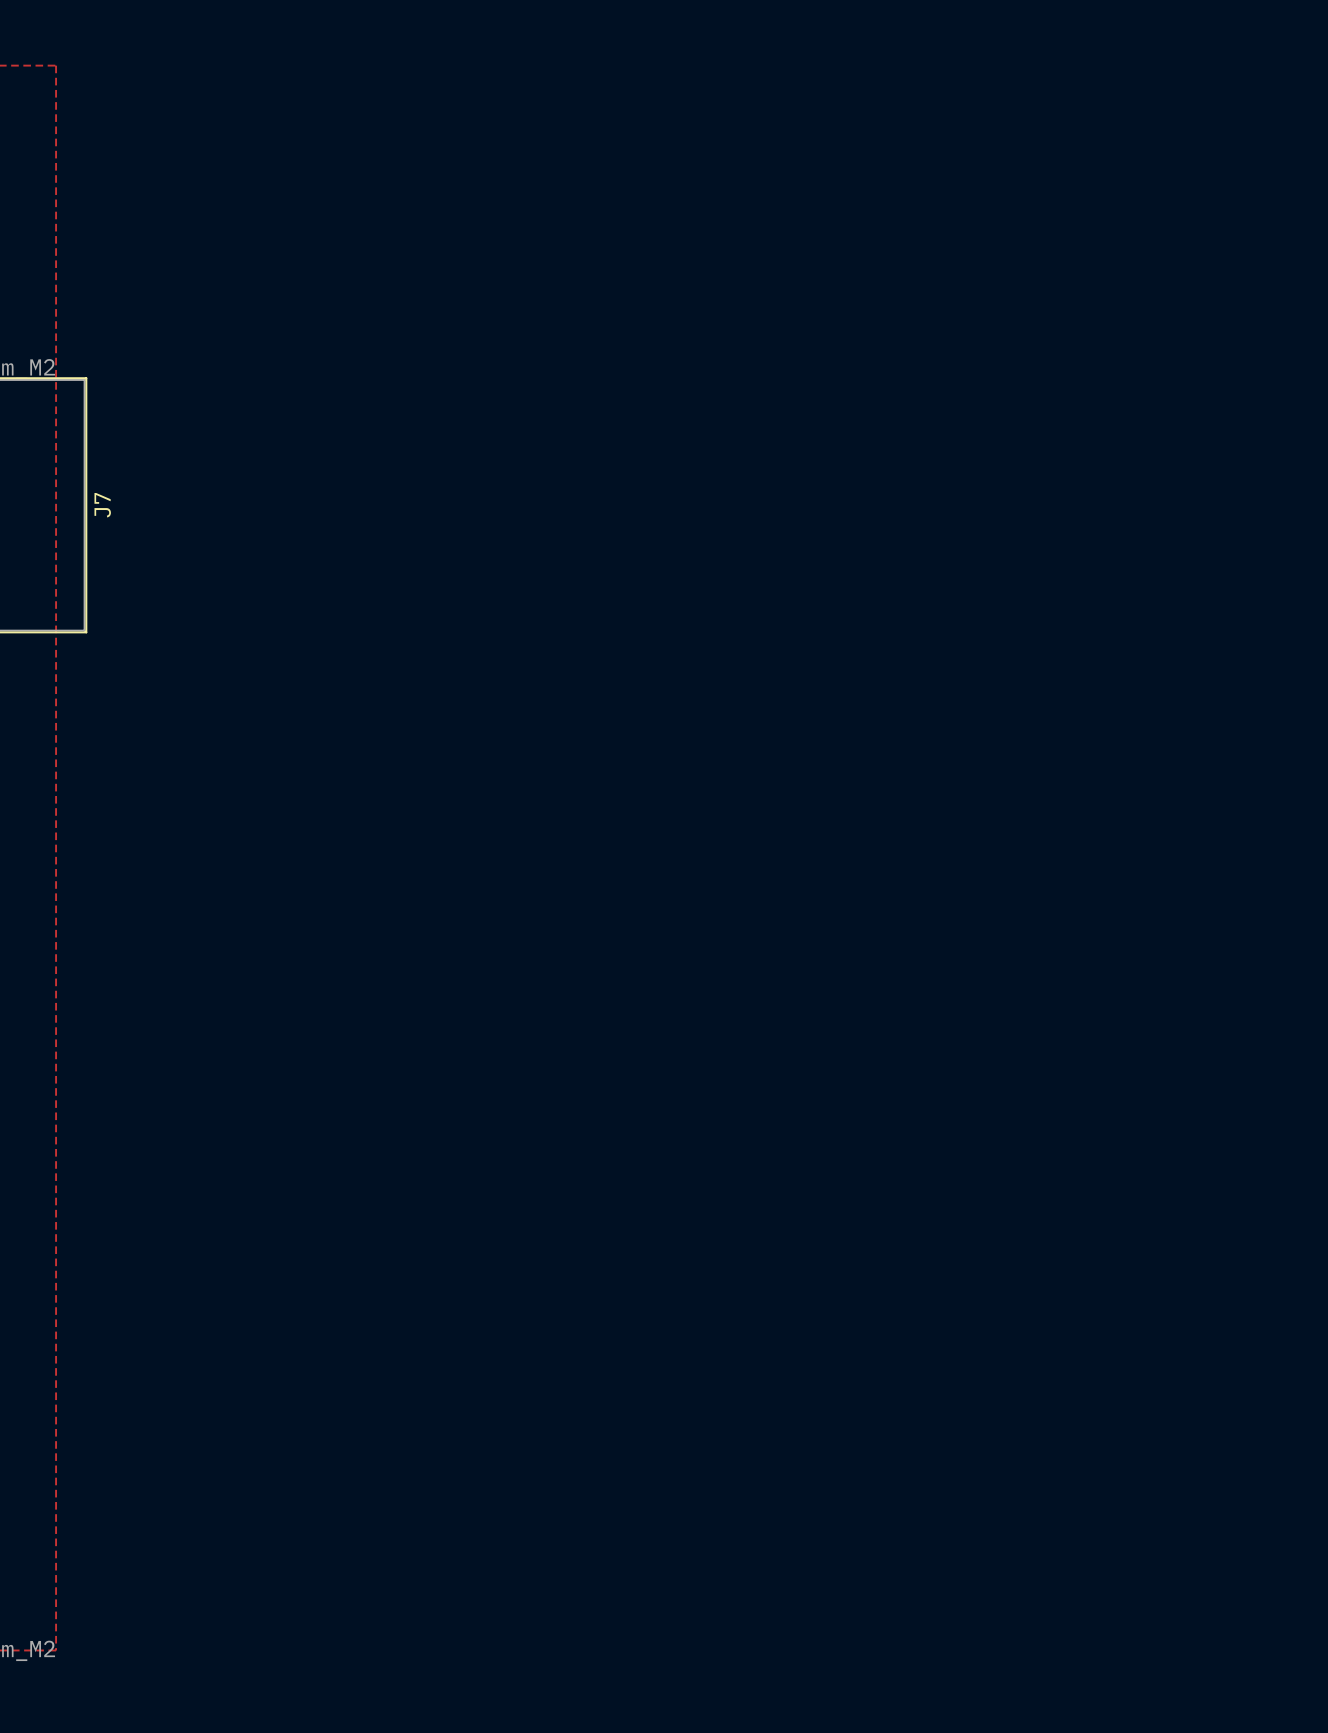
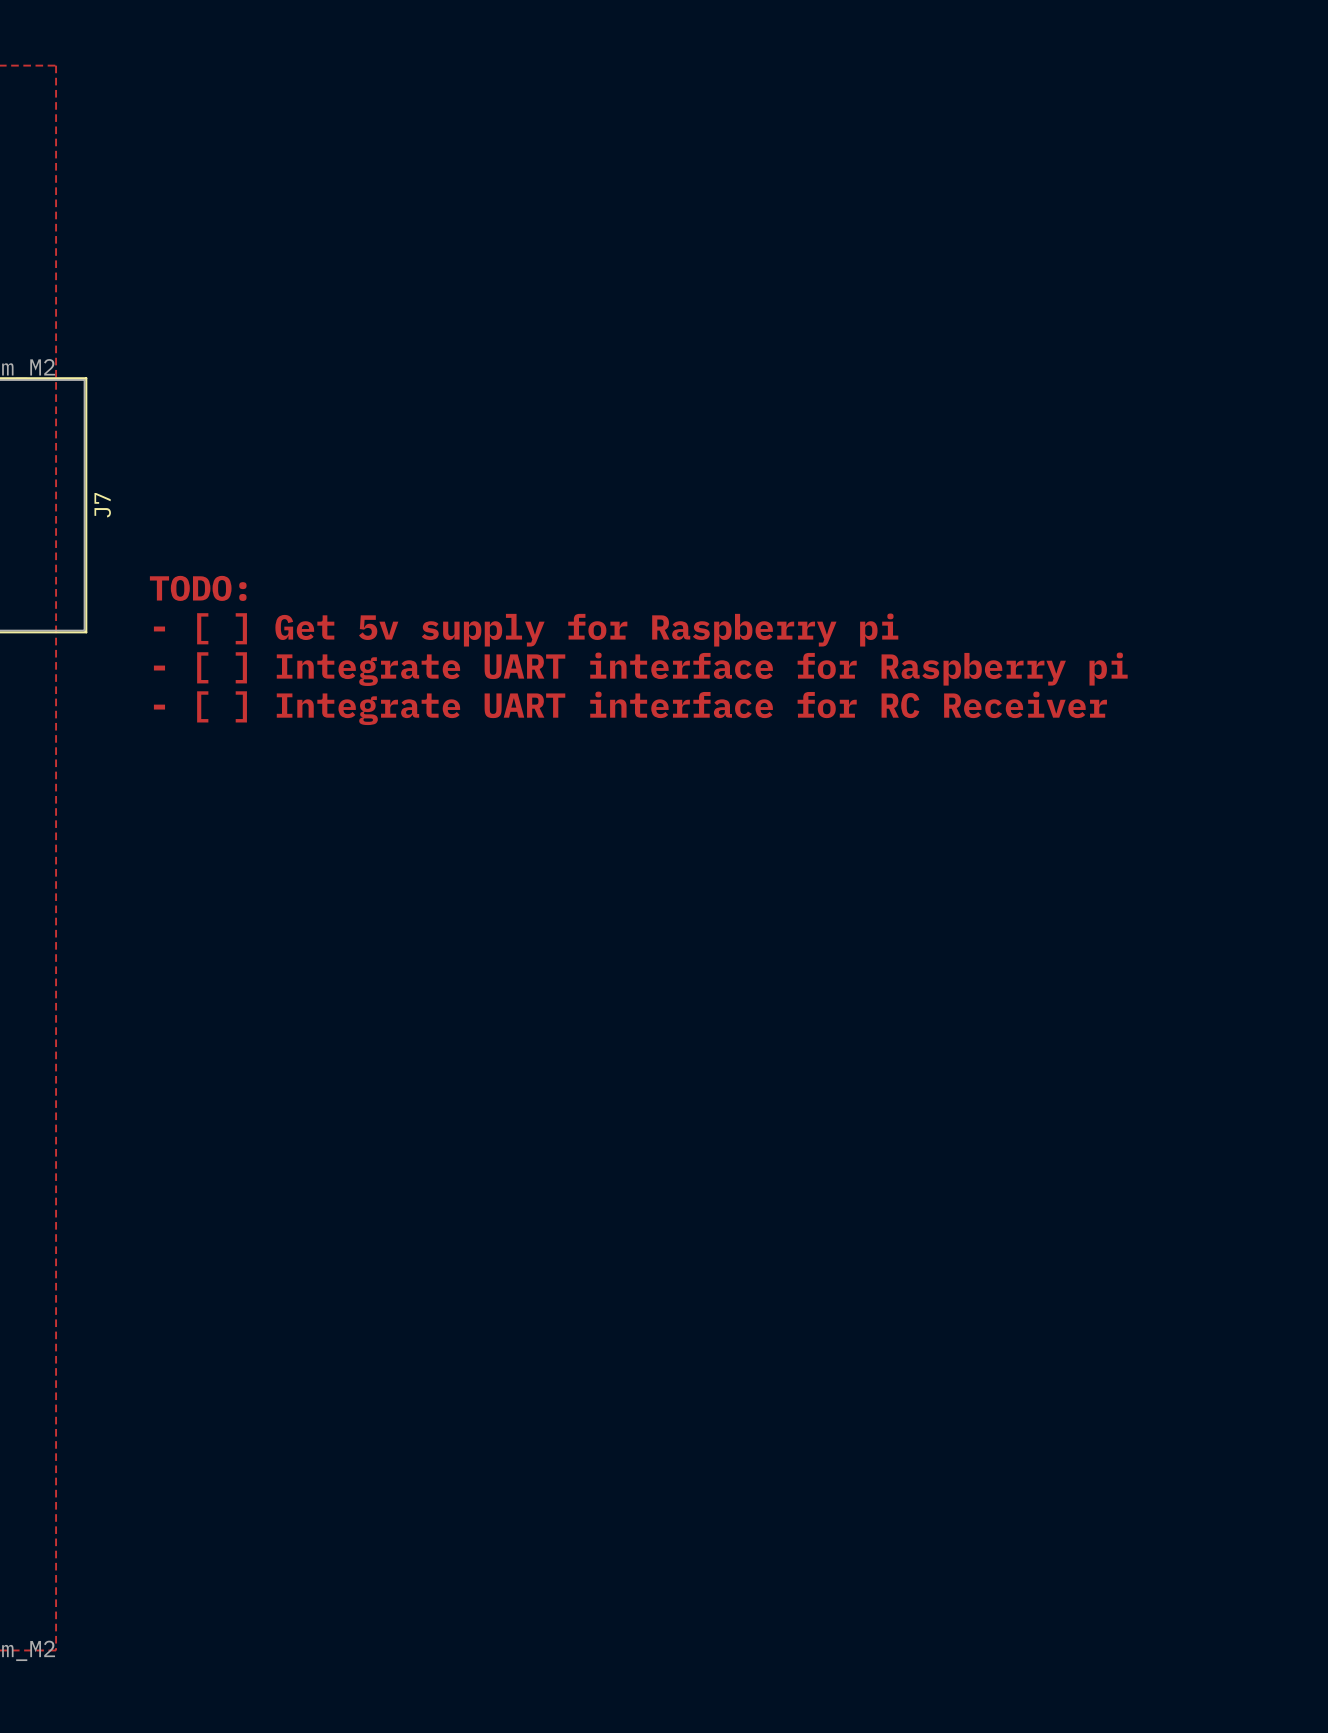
text: none -> TODO: (198, 588)
text: none -> - [ ] Get 5v supply for Raspberry pi (526, 629)
text: none -> - [ ] Integrate UART interface for Raspberry pi (640, 669)
text: none -> - [ ] Integrate UART interface for RC Receiver (630, 708)

